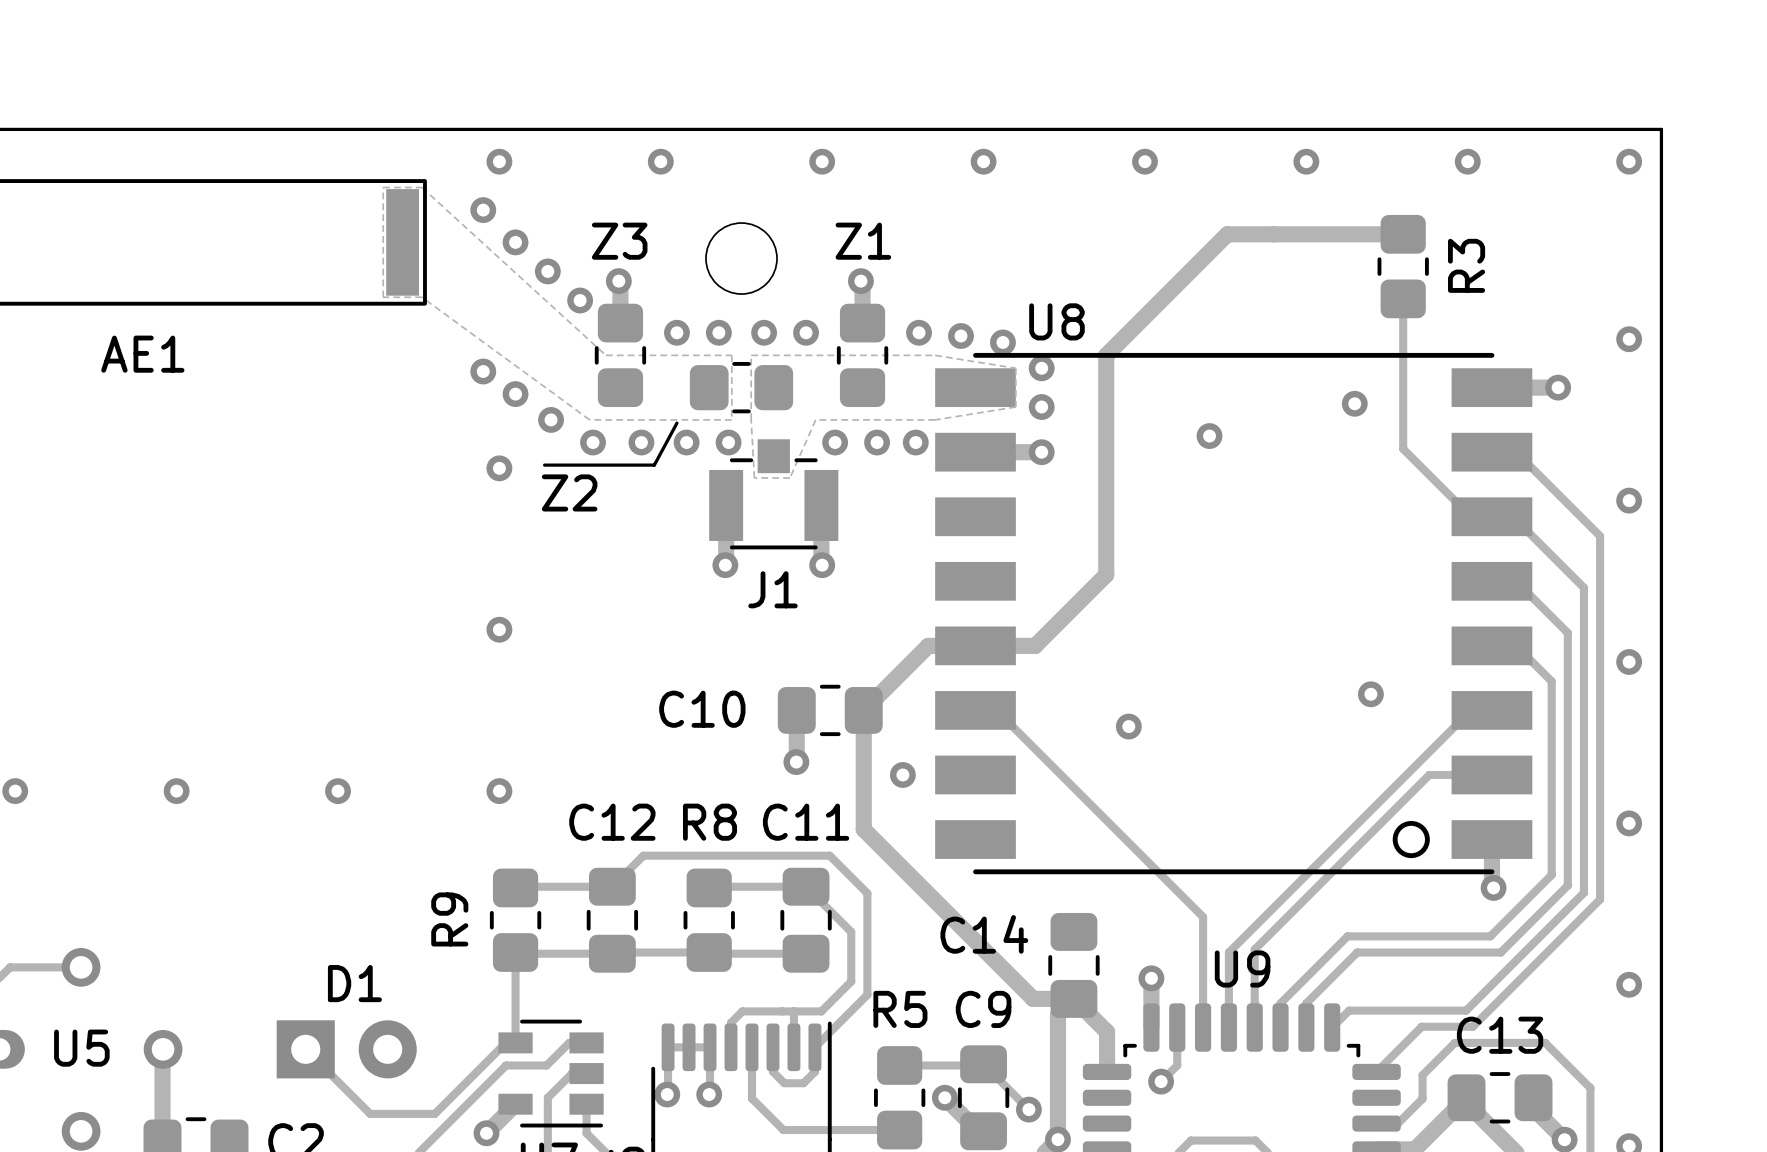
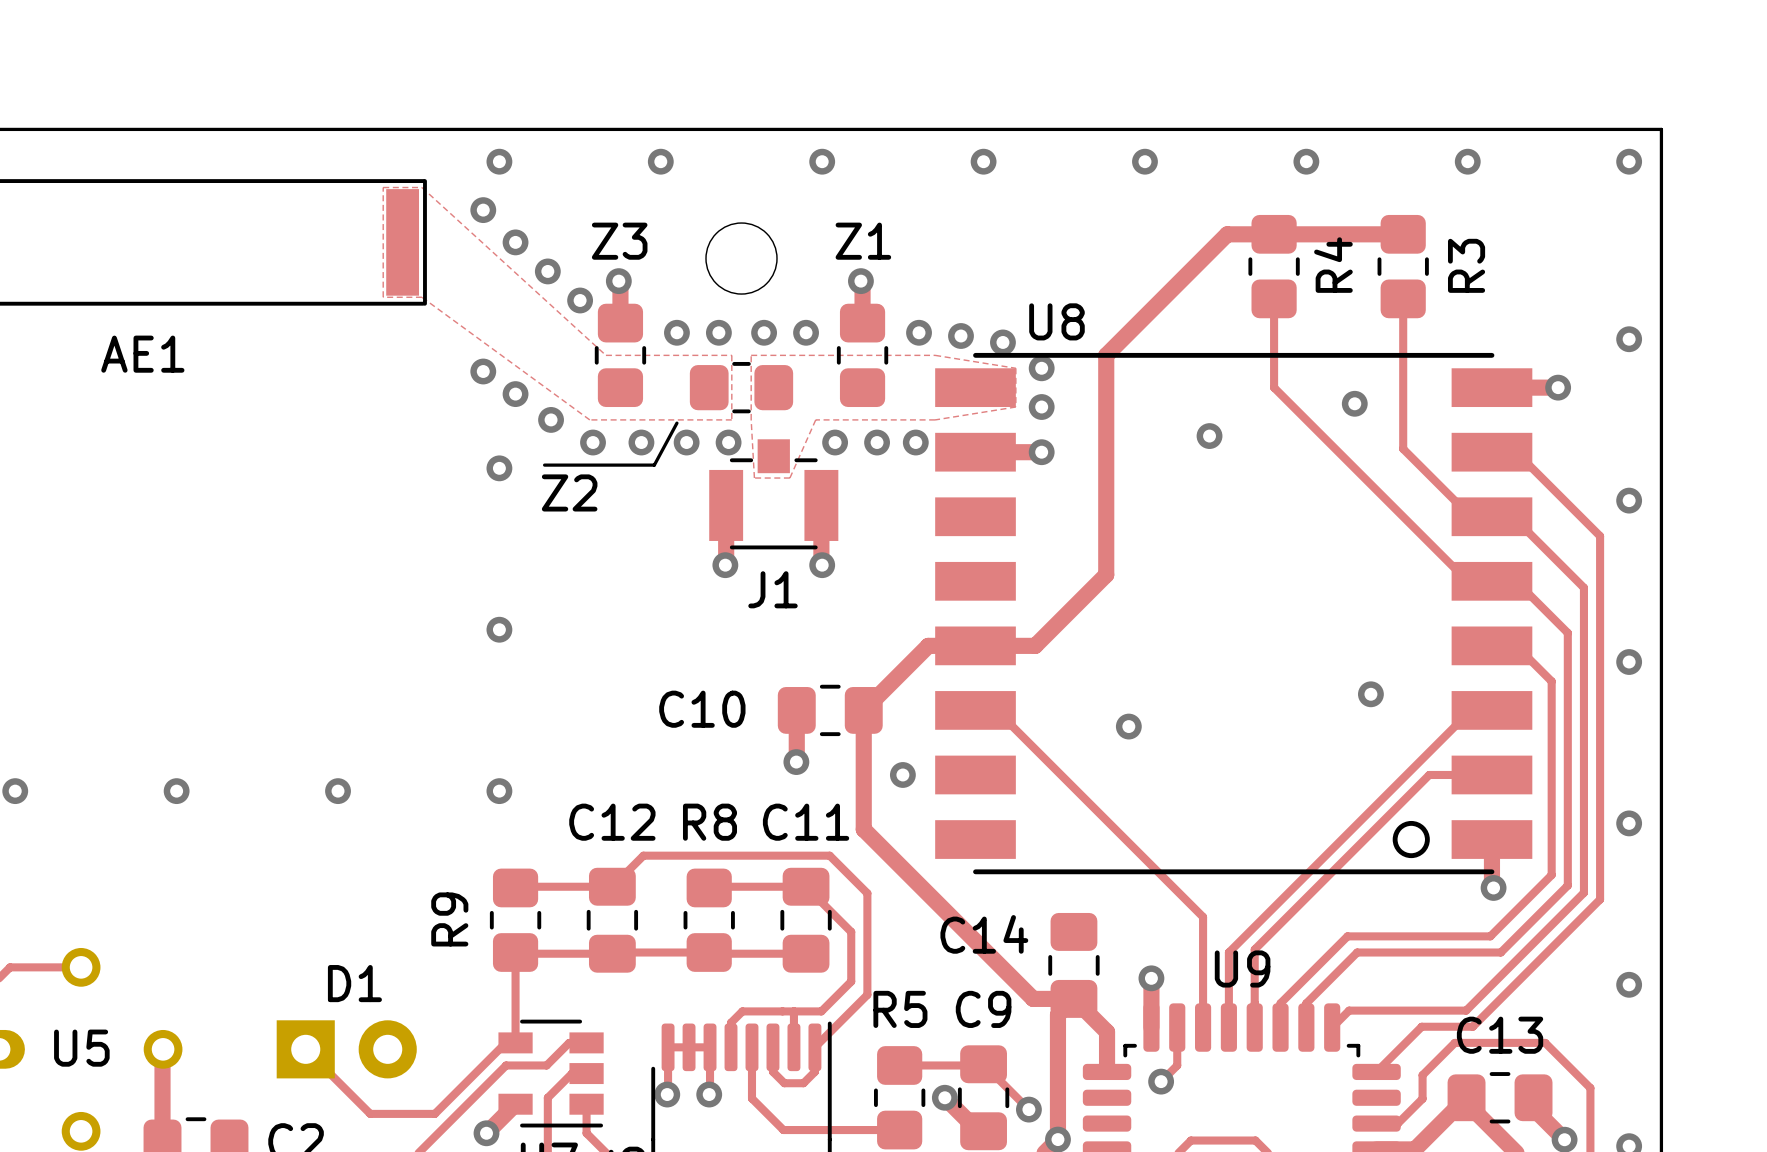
R4: none -> (1274, 266)
track: none -> (1274, 298) (1274, 387) (1467, 581)

